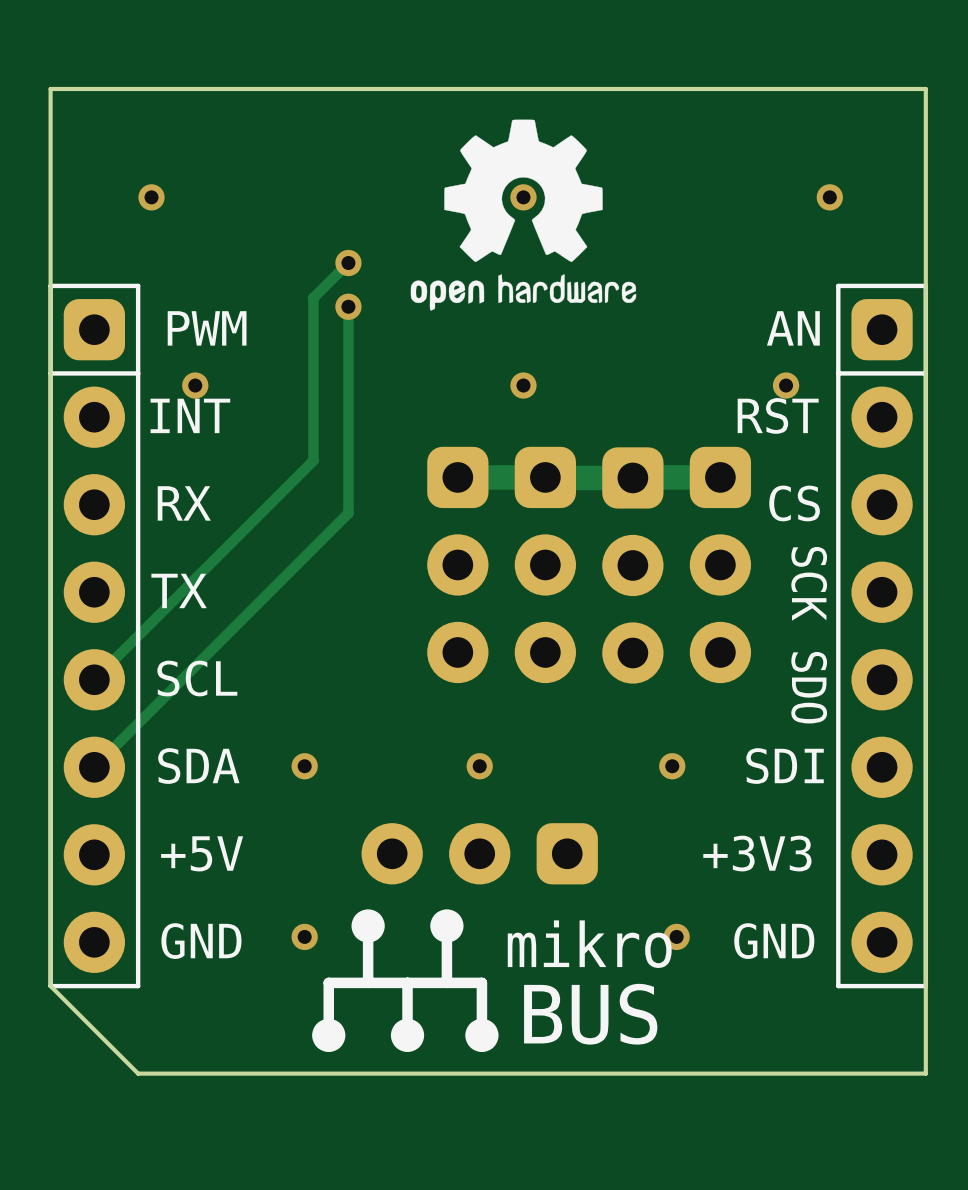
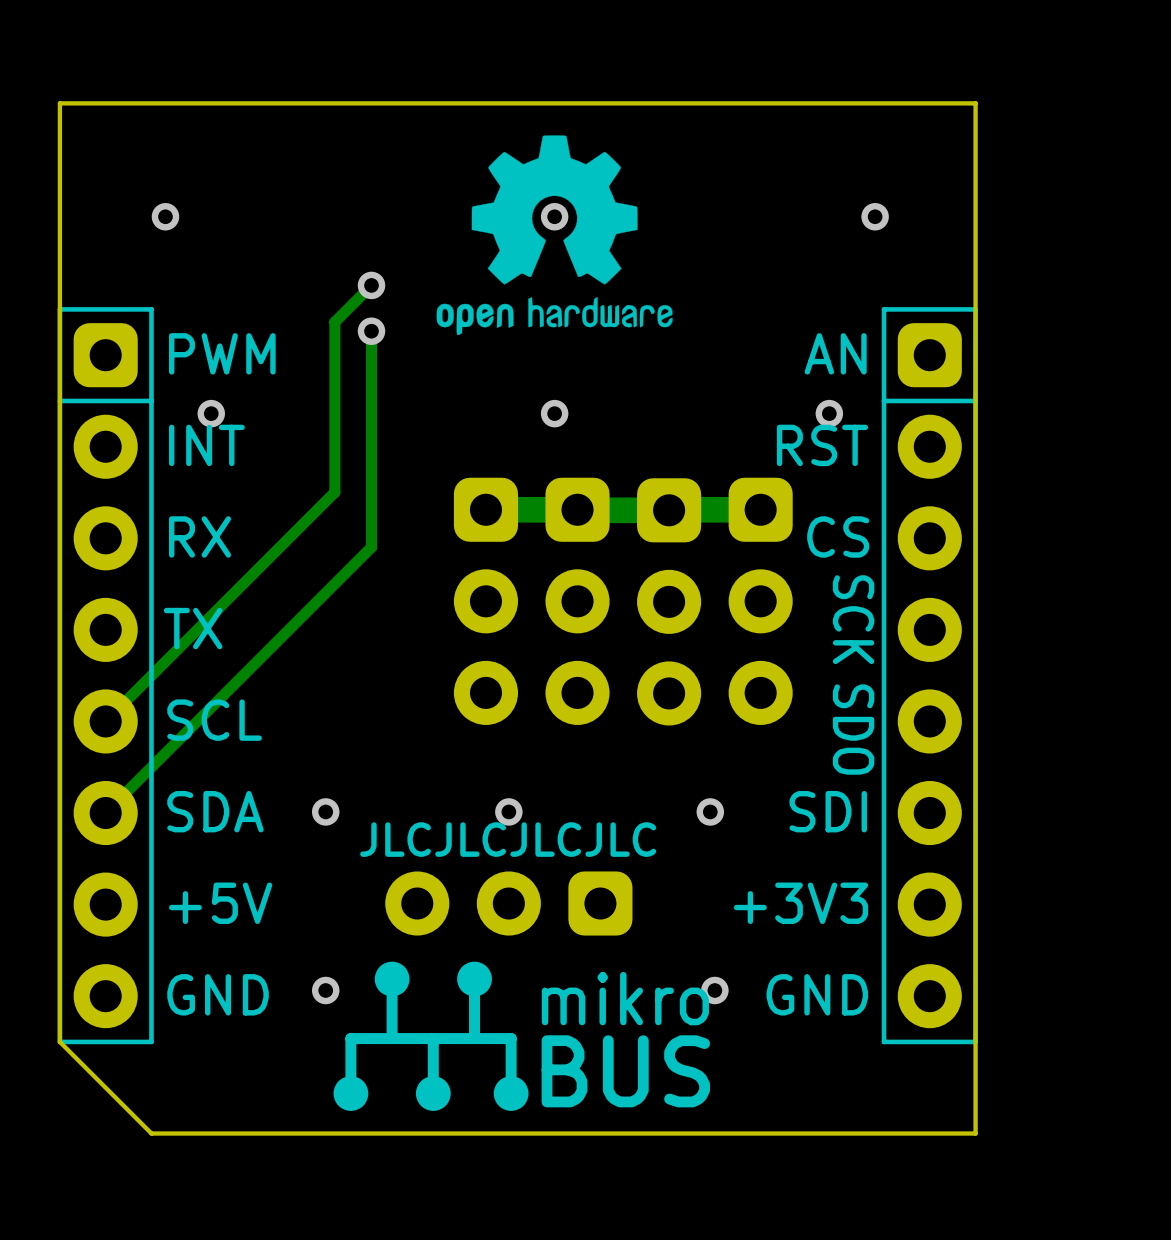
text: none -> JLCJLCJLCJLC (508, 839)

